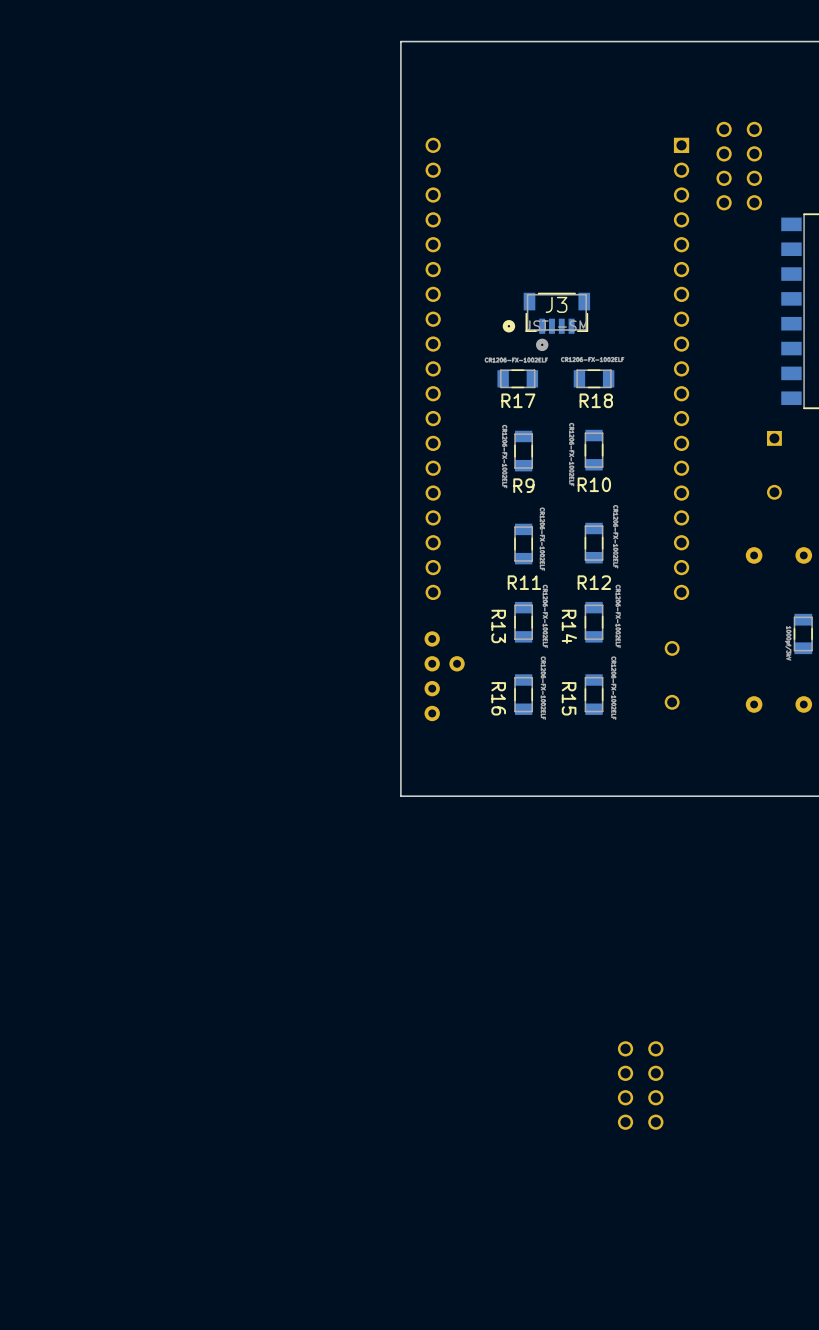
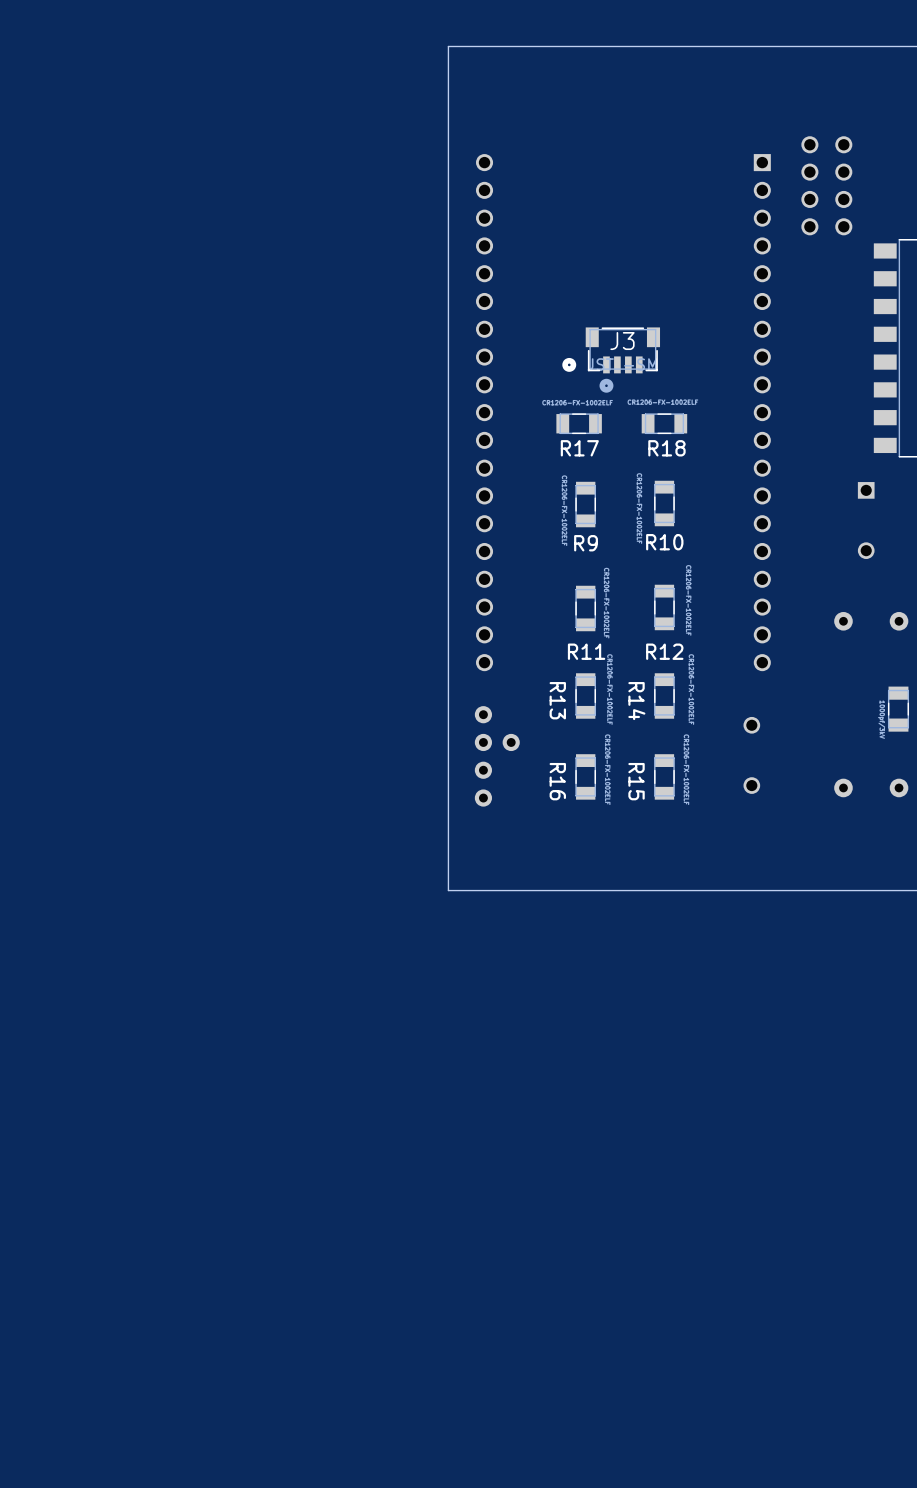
part: (640, 1085) -> none

